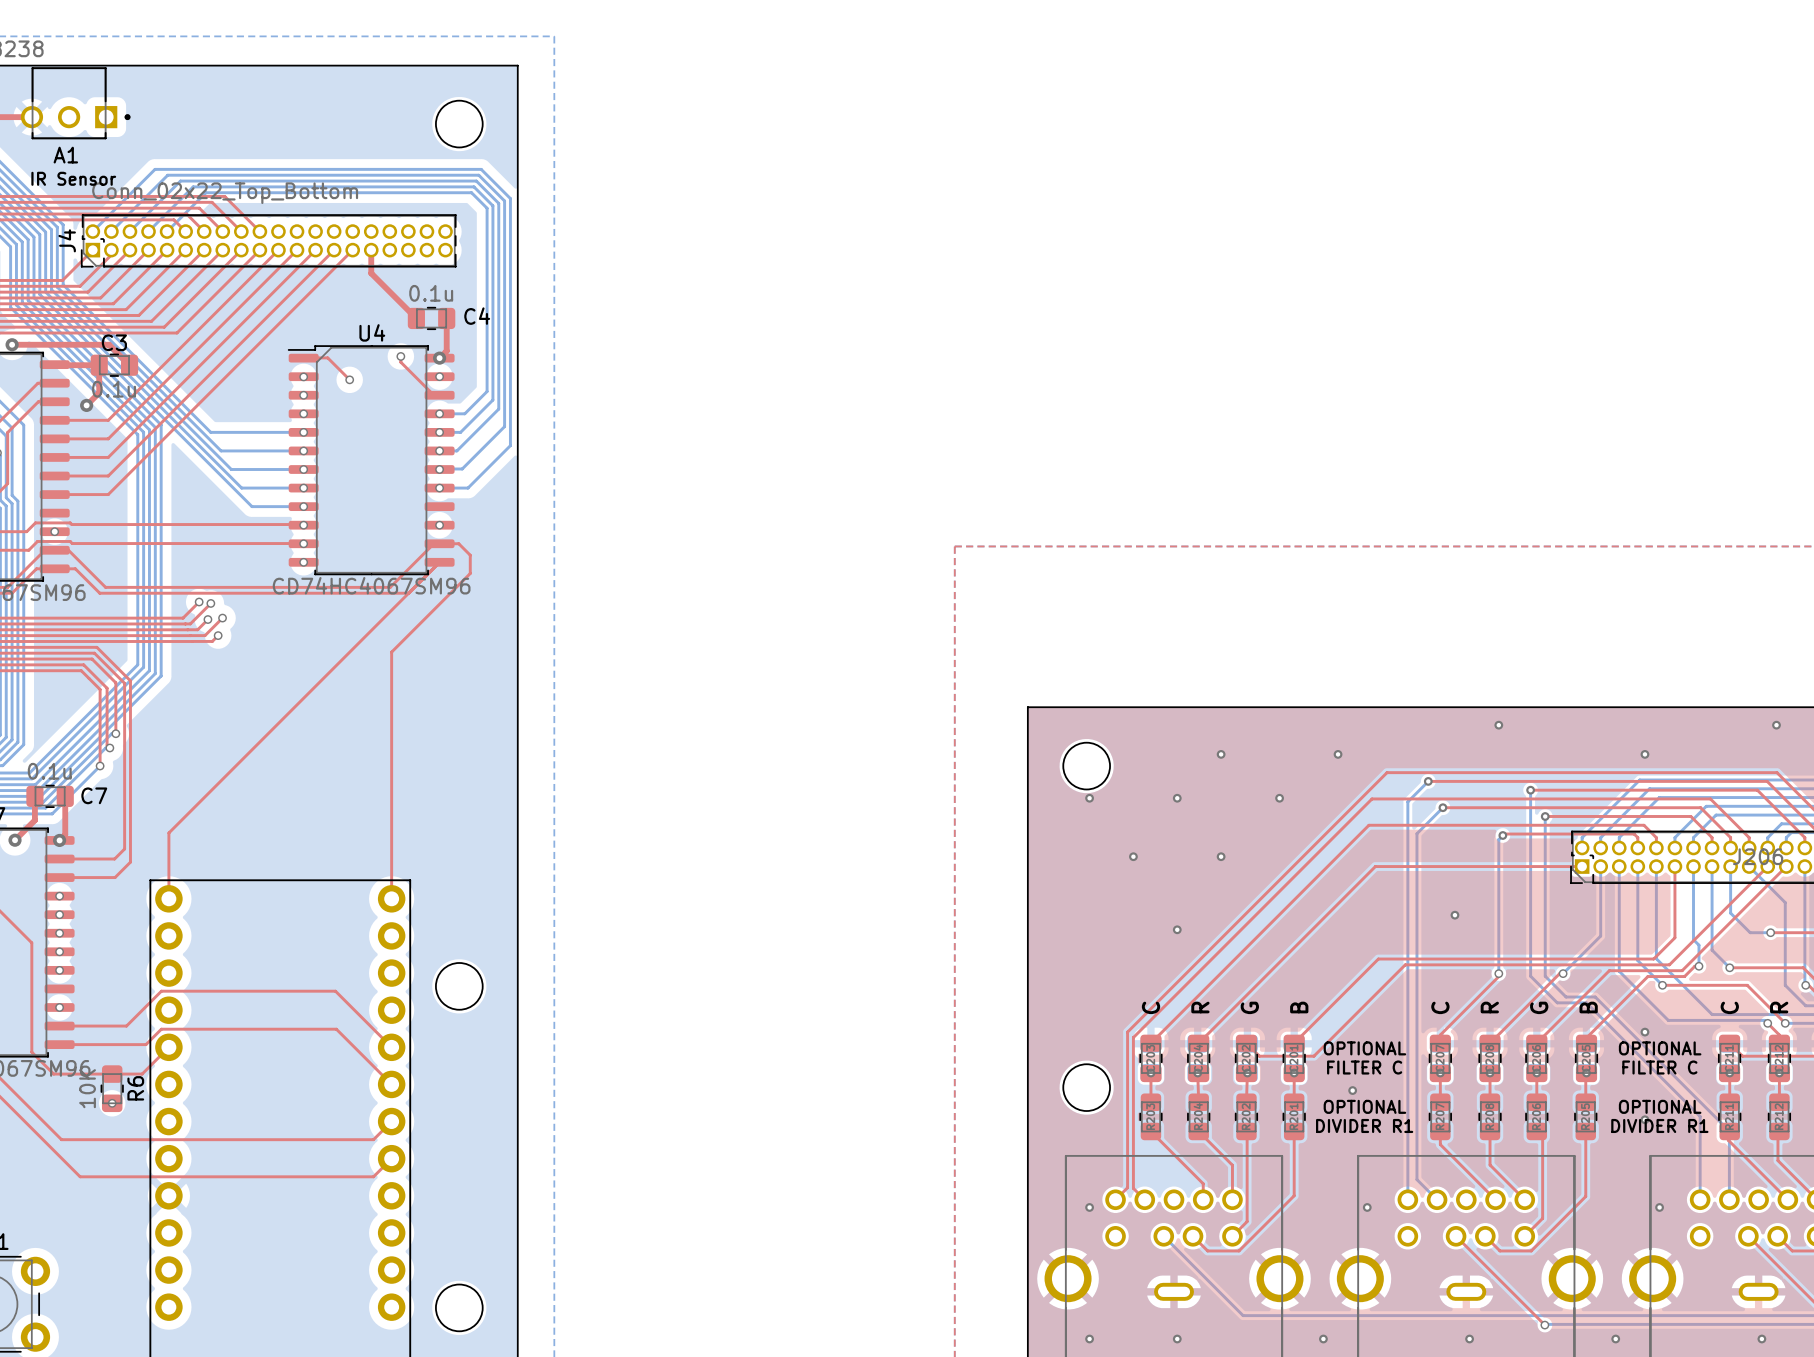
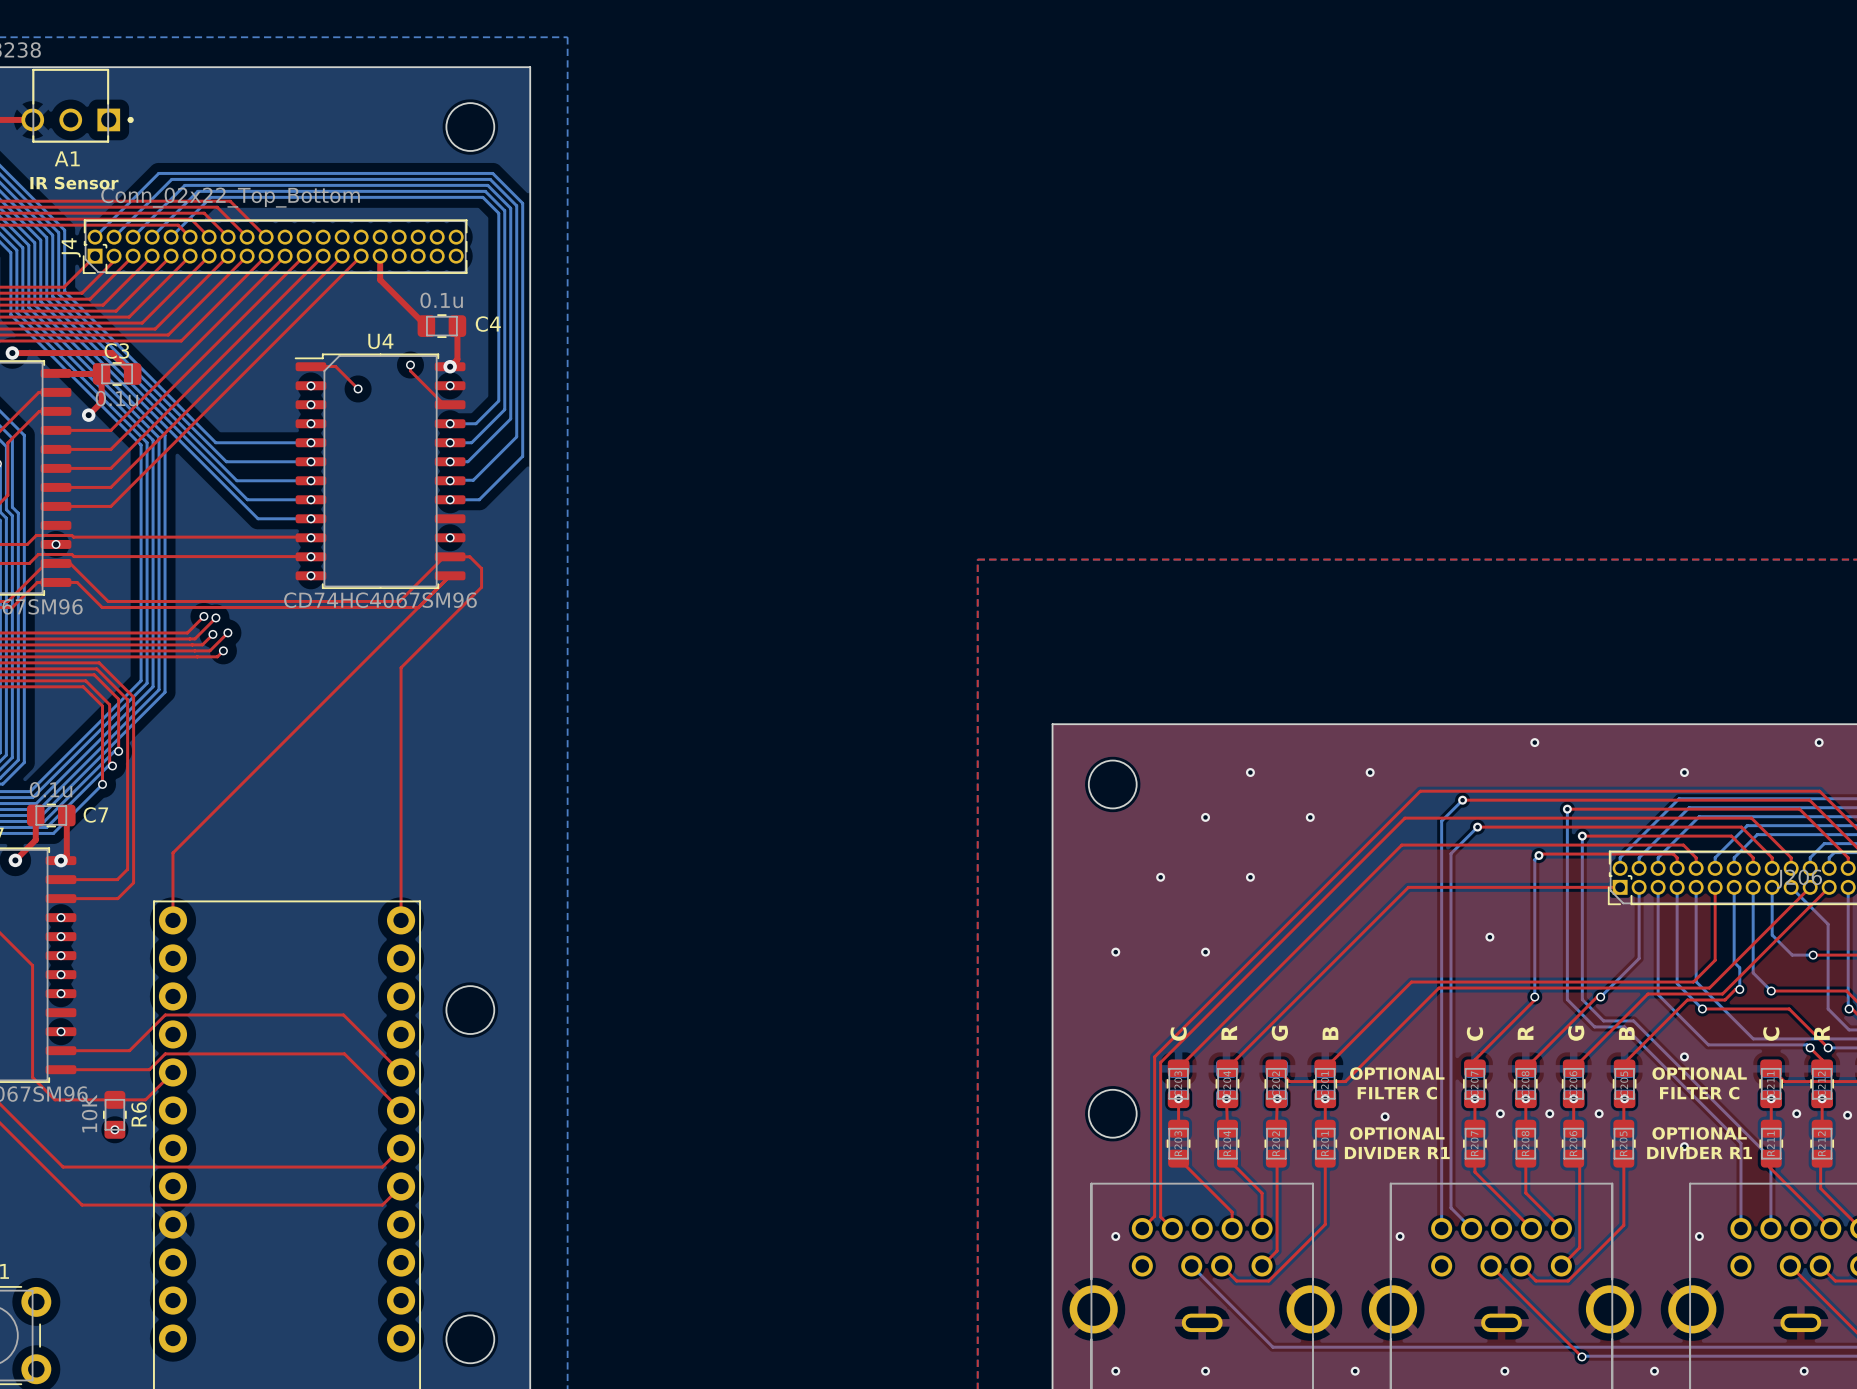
via: (1089, 798) -> none
via: none -> (1115, 952)
via: none -> (1500, 1113)
via: none -> (1549, 1113)
via: none -> (1599, 1113)
via: none -> (1796, 1113)
via: none -> (1847, 1115)

